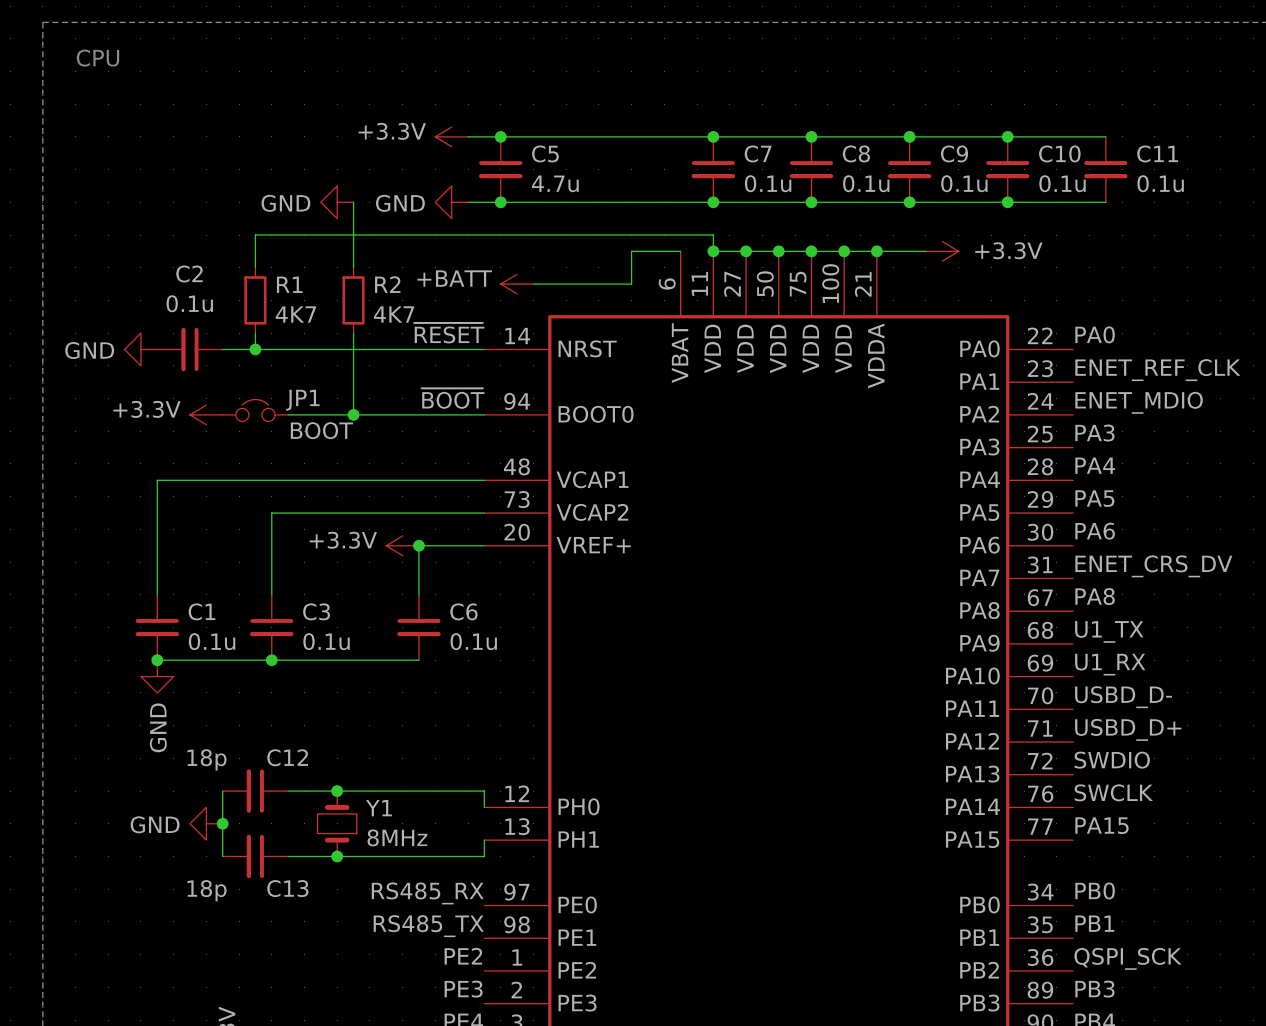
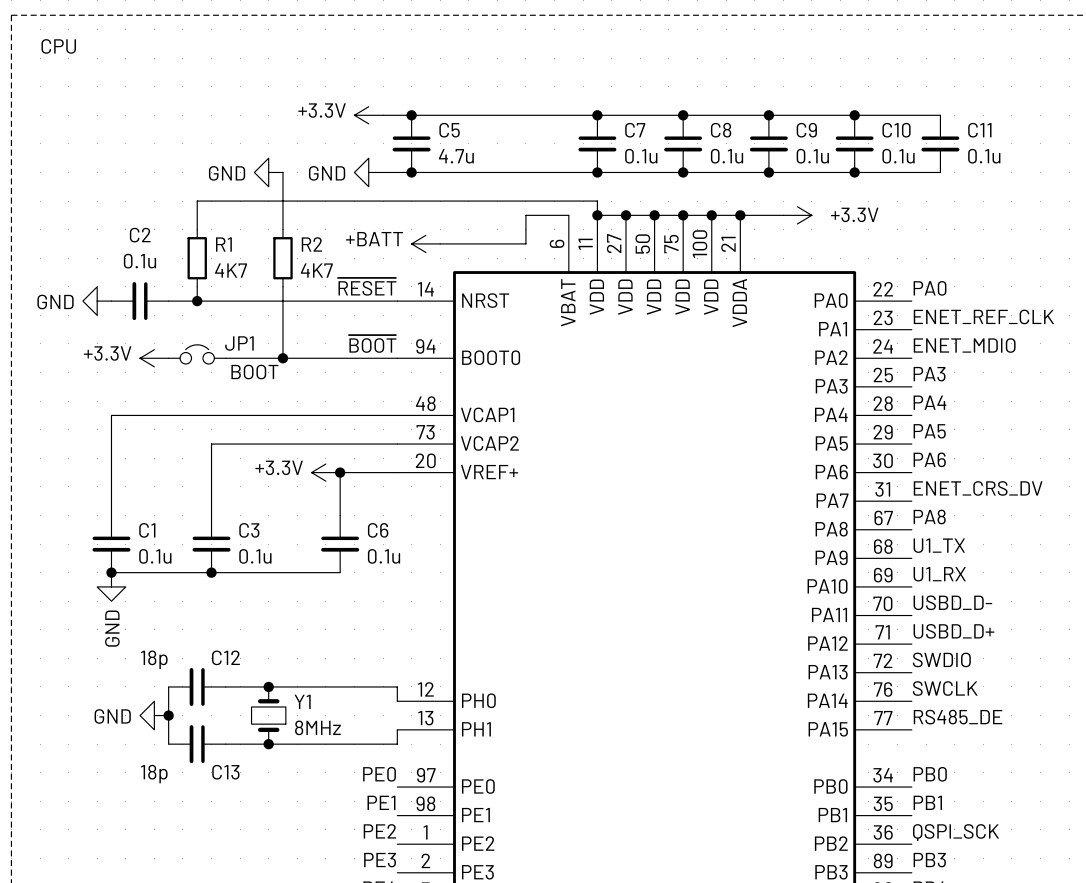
label: PA15 (1101, 825) -> RS485_DE (958, 717)
label: RS485_RX (427, 893) -> PE0 (379, 774)
label: RS485_TX (428, 926) -> PE1 (381, 802)

